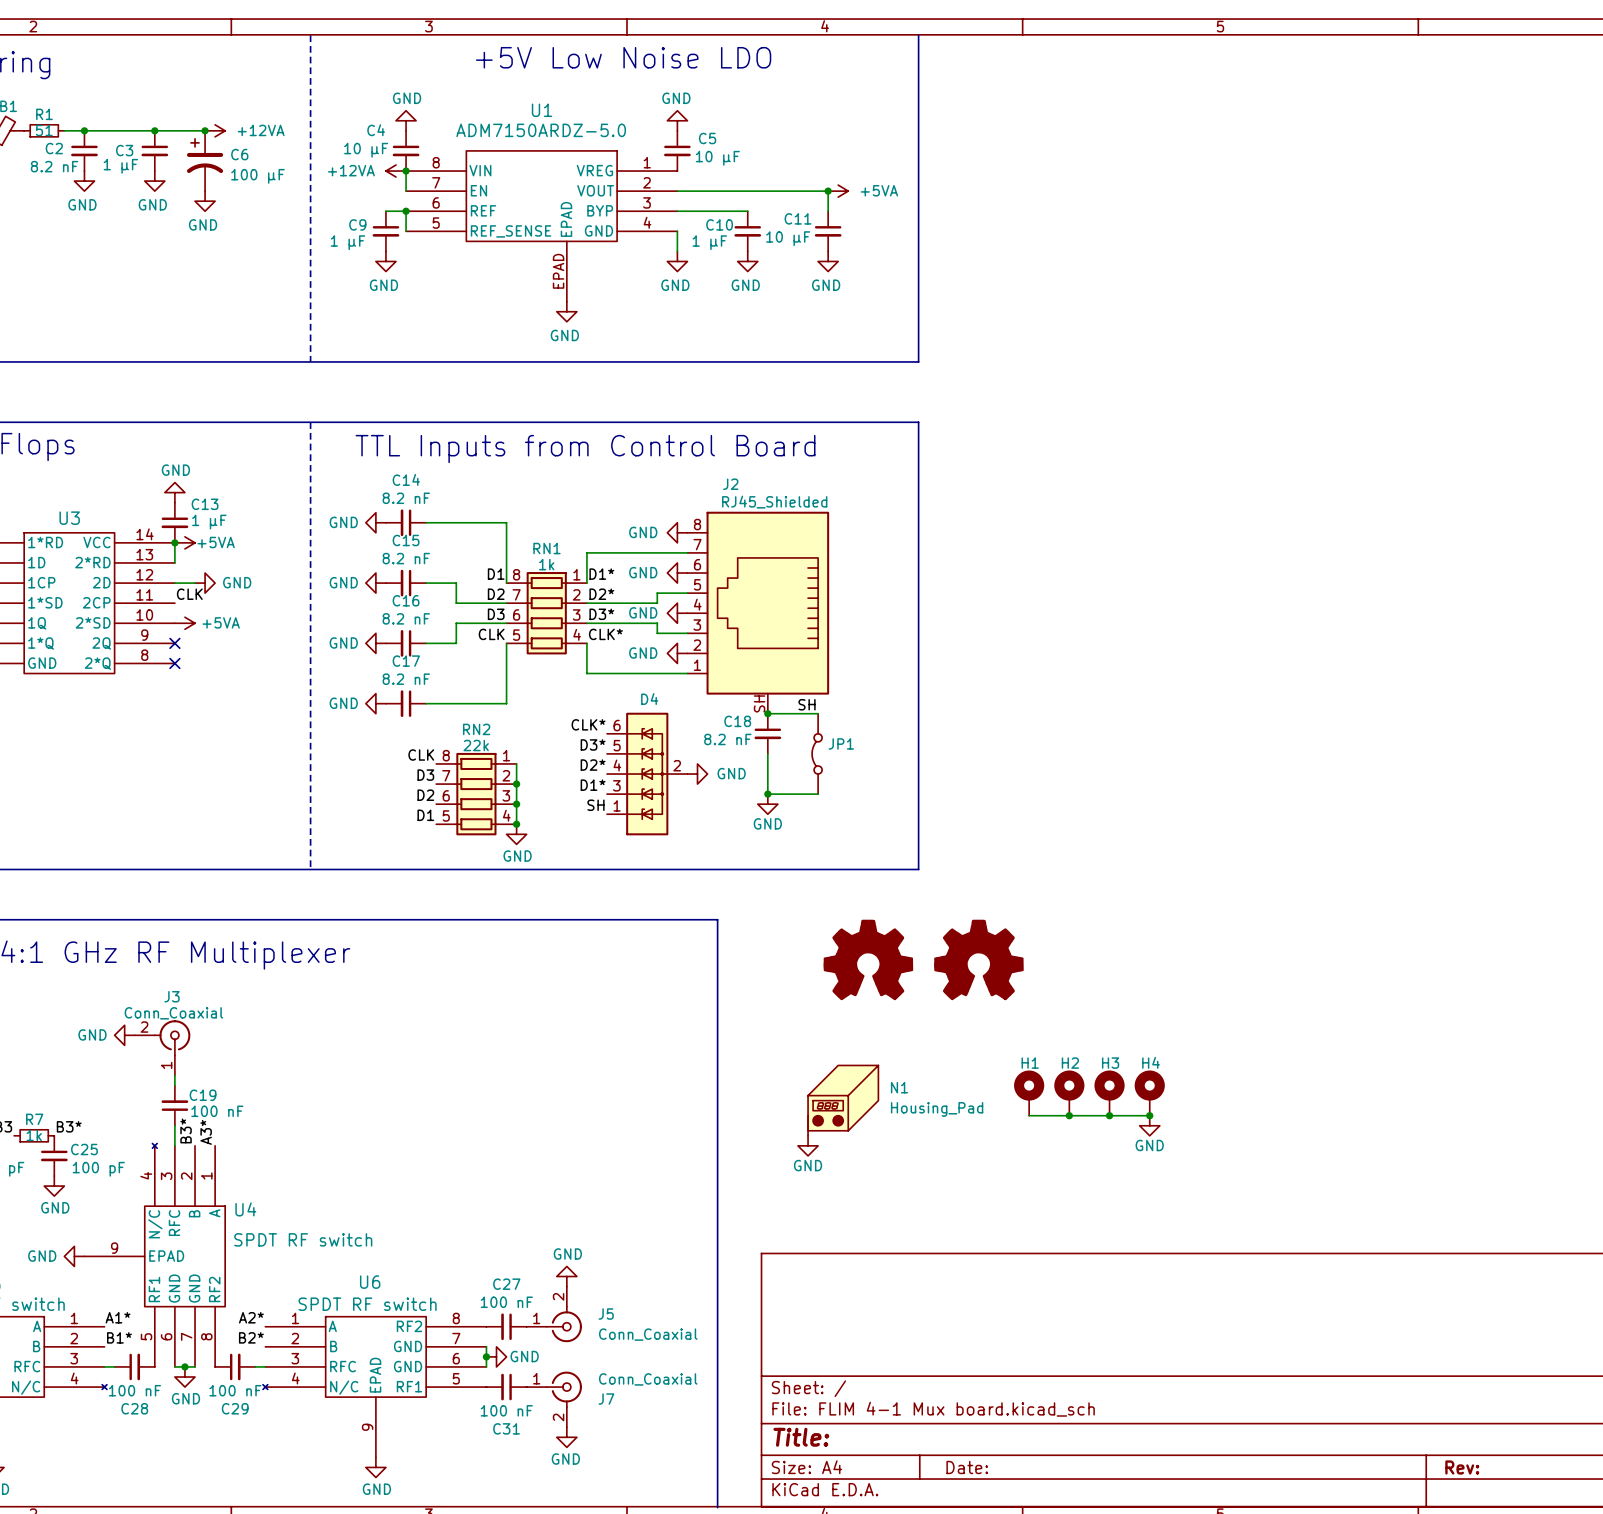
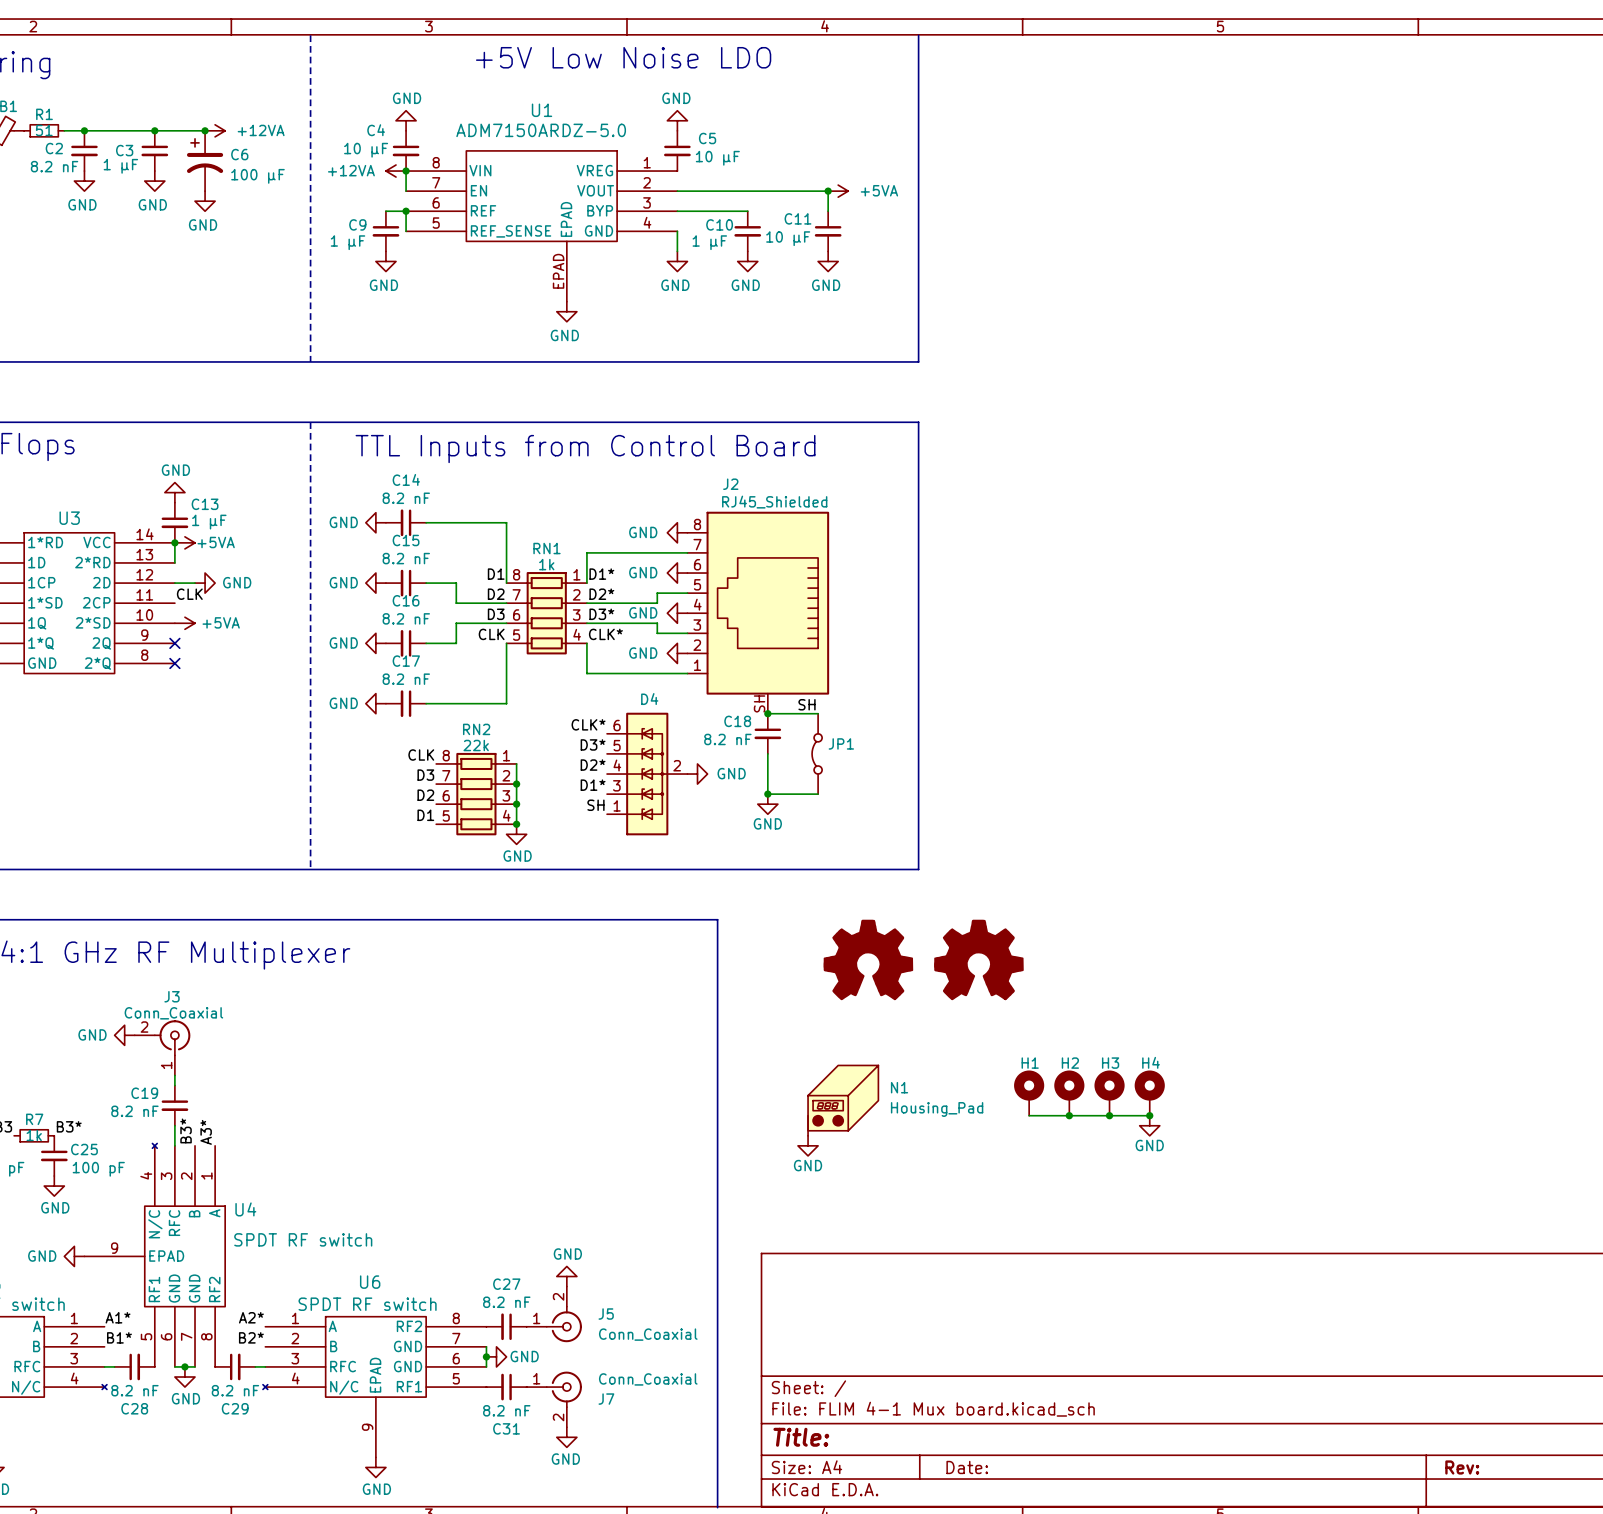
C19 name position: C19 (203, 1095) -> C19 (144, 1093)
C19 rotation: 0° (174, 1105) -> 180° (174, 1105)
C19 value: 100 nF (217, 1111) -> 8.2 nF (134, 1111)
C27 value: 100 nF (506, 1302) -> 8.2 nF (506, 1302)
C28 value: 100 nF (134, 1390) -> 8.2 nF (134, 1390)
C29 value: 100 nF (235, 1390) -> 8.2 nF (235, 1390)
C31 value: 100 nF (506, 1410) -> 8.2 nF (506, 1410)

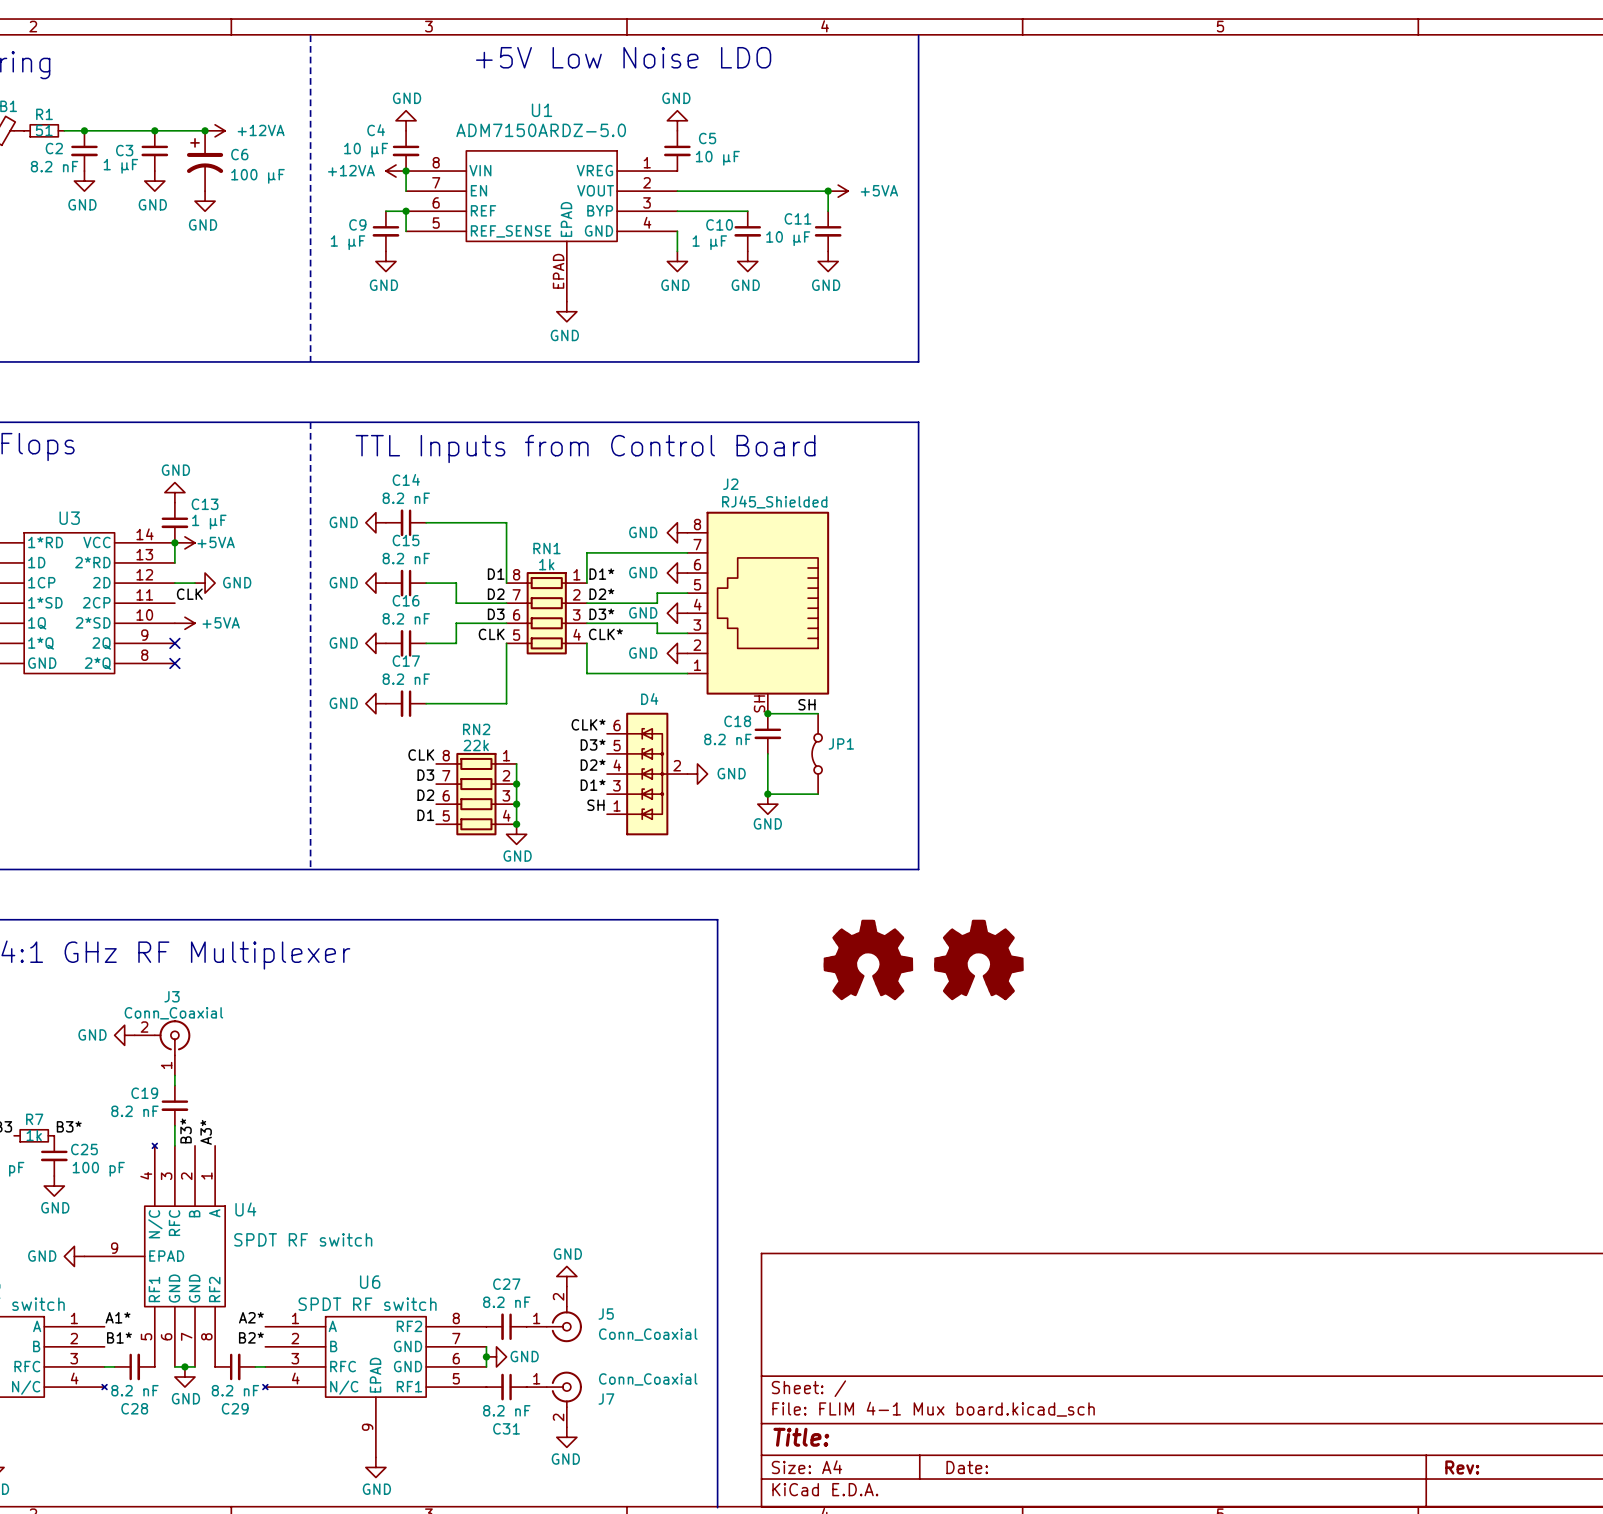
H1: (1029, 1093) -> none
H2: (1069, 1093) -> none
H3: (1109, 1093) -> none
H4: (1149, 1093) -> none
N1: Housing_Pad (843, 1100) -> none
wire: (1029, 1115) (1149, 1115) -> none
junction: (1069, 1115) -> none
junction: (1109, 1115) -> none
junction: (1149, 1115) -> none
power symbol: GND (1149, 1125) -> none
power symbol: GND (808, 1145) -> none

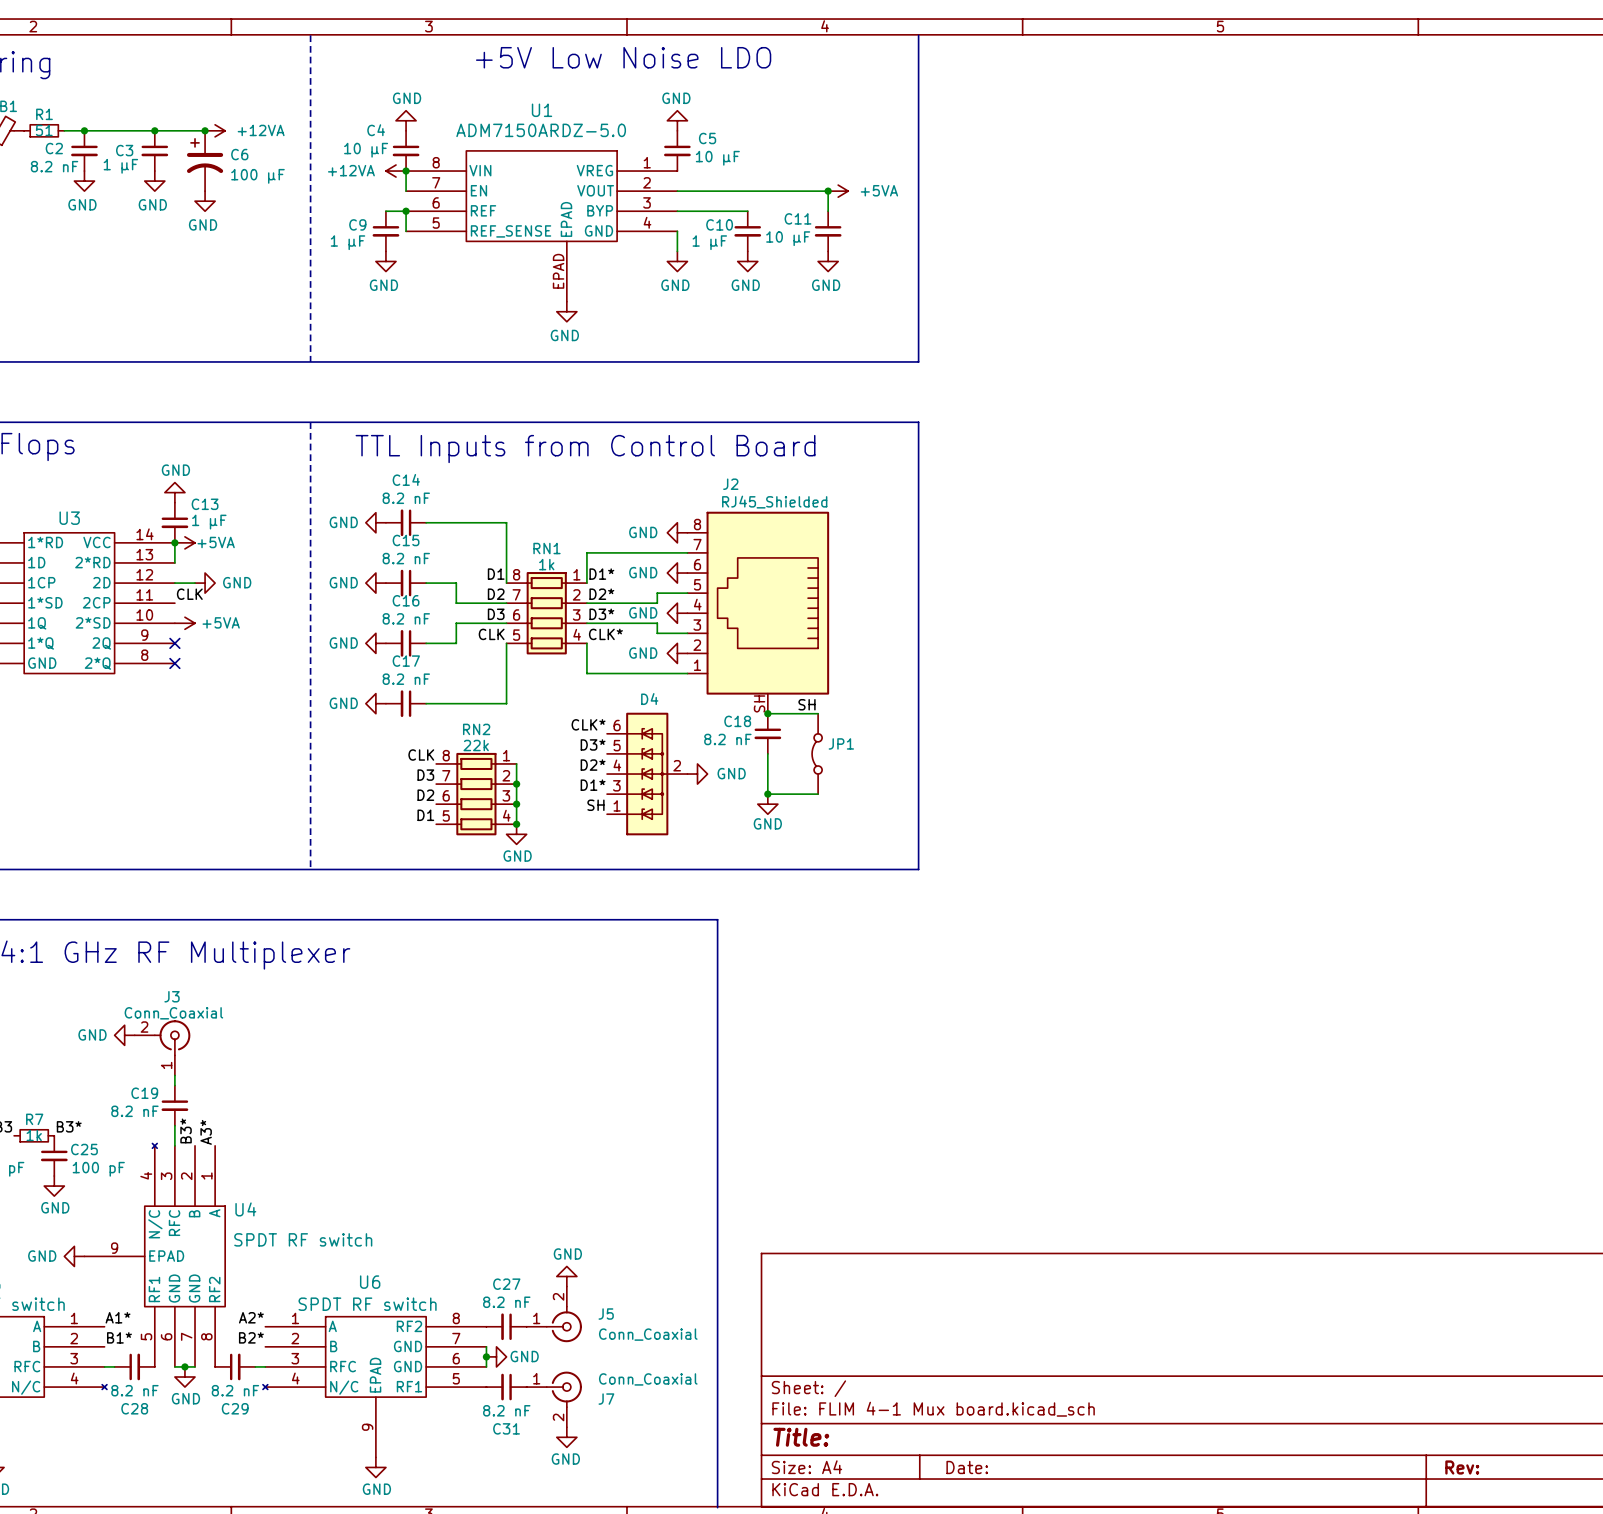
part: (868, 959) -> none
part: (978, 959) -> none

